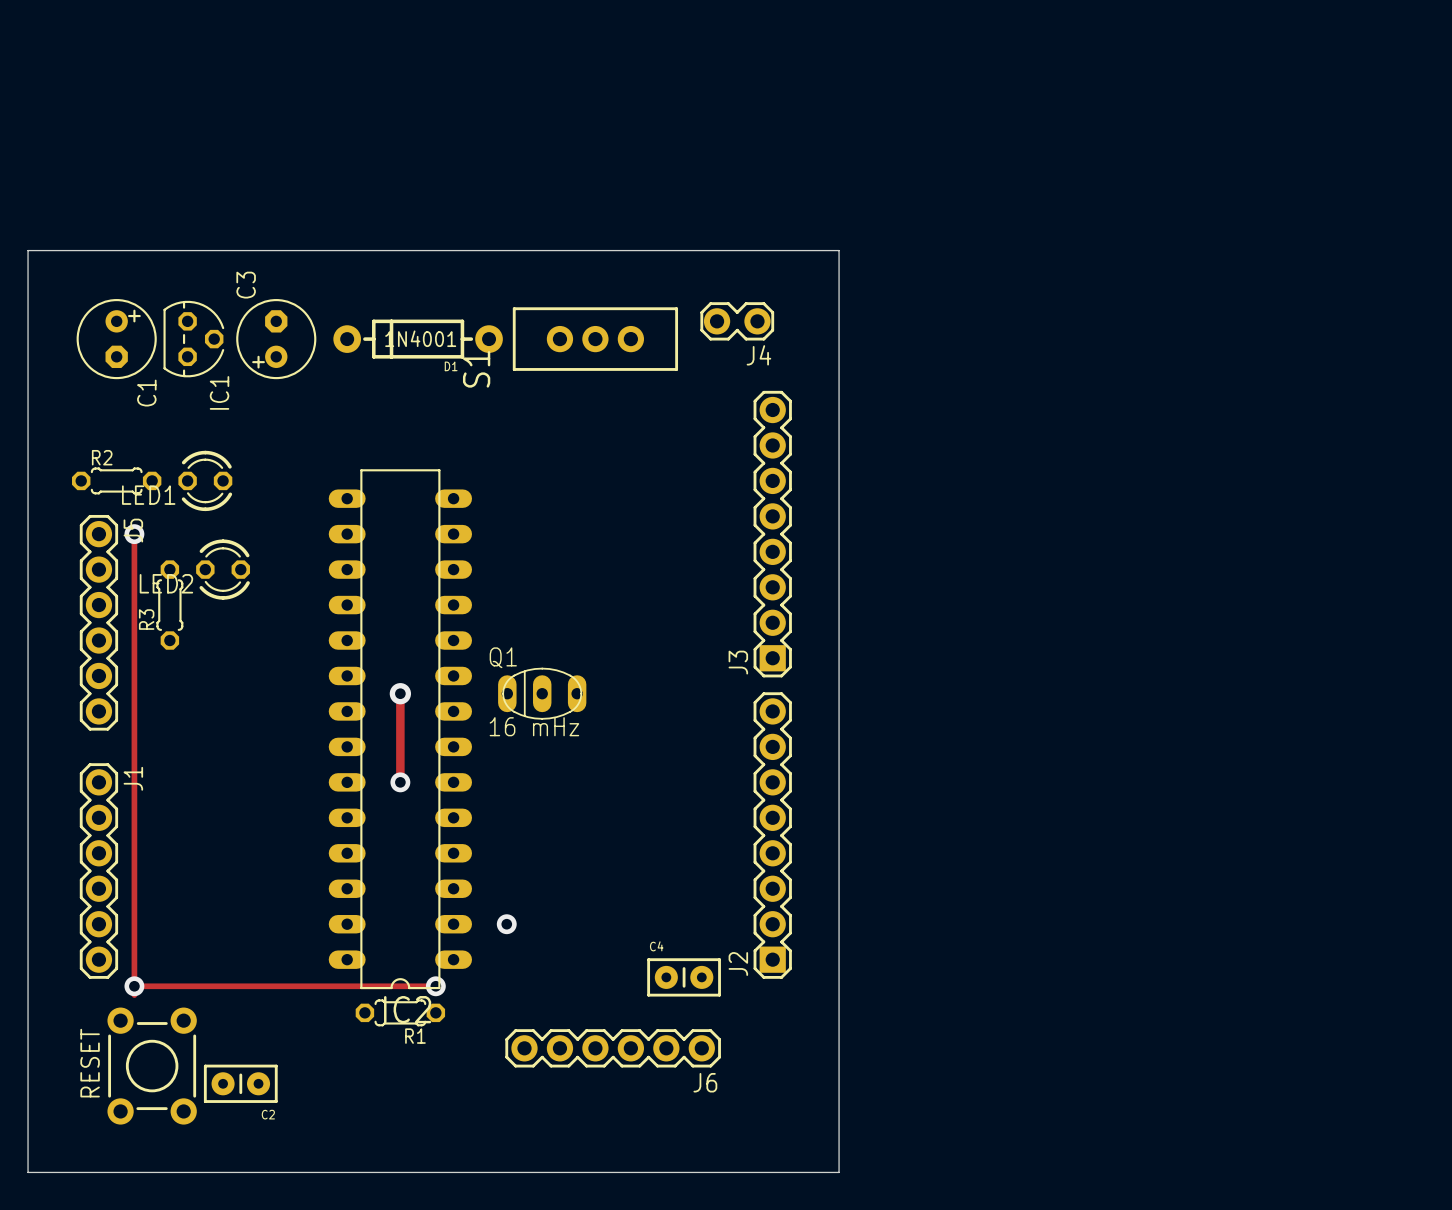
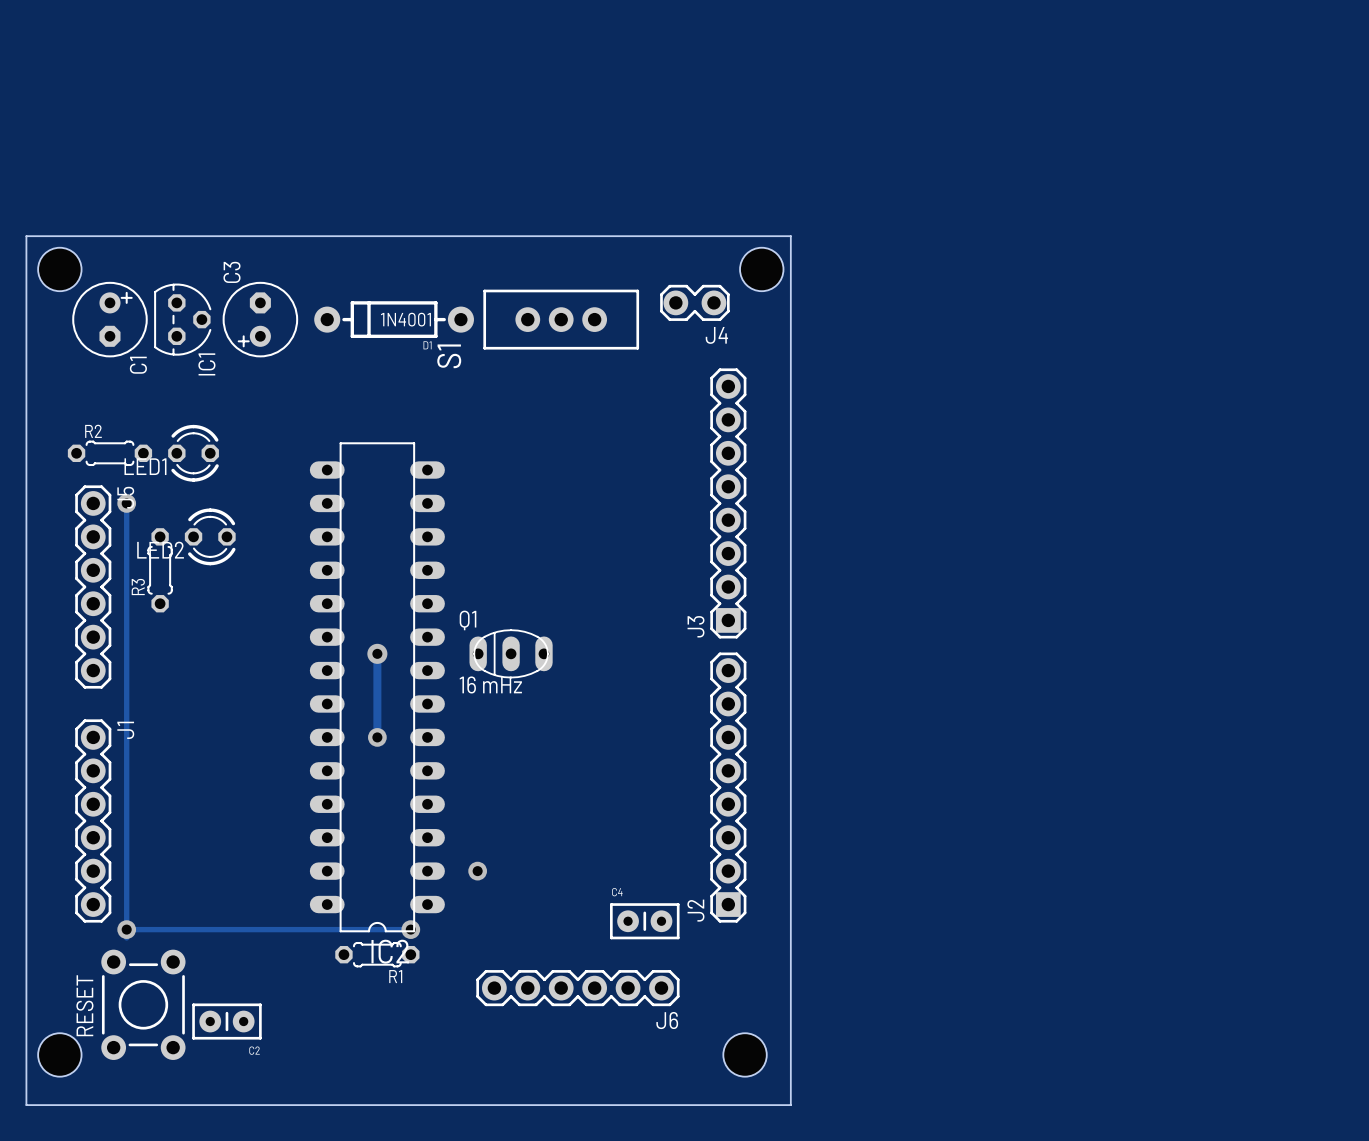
part: none -> (59, 269)
part: none -> (761, 269)
part: none -> (59, 1054)
part: none -> (745, 1054)

